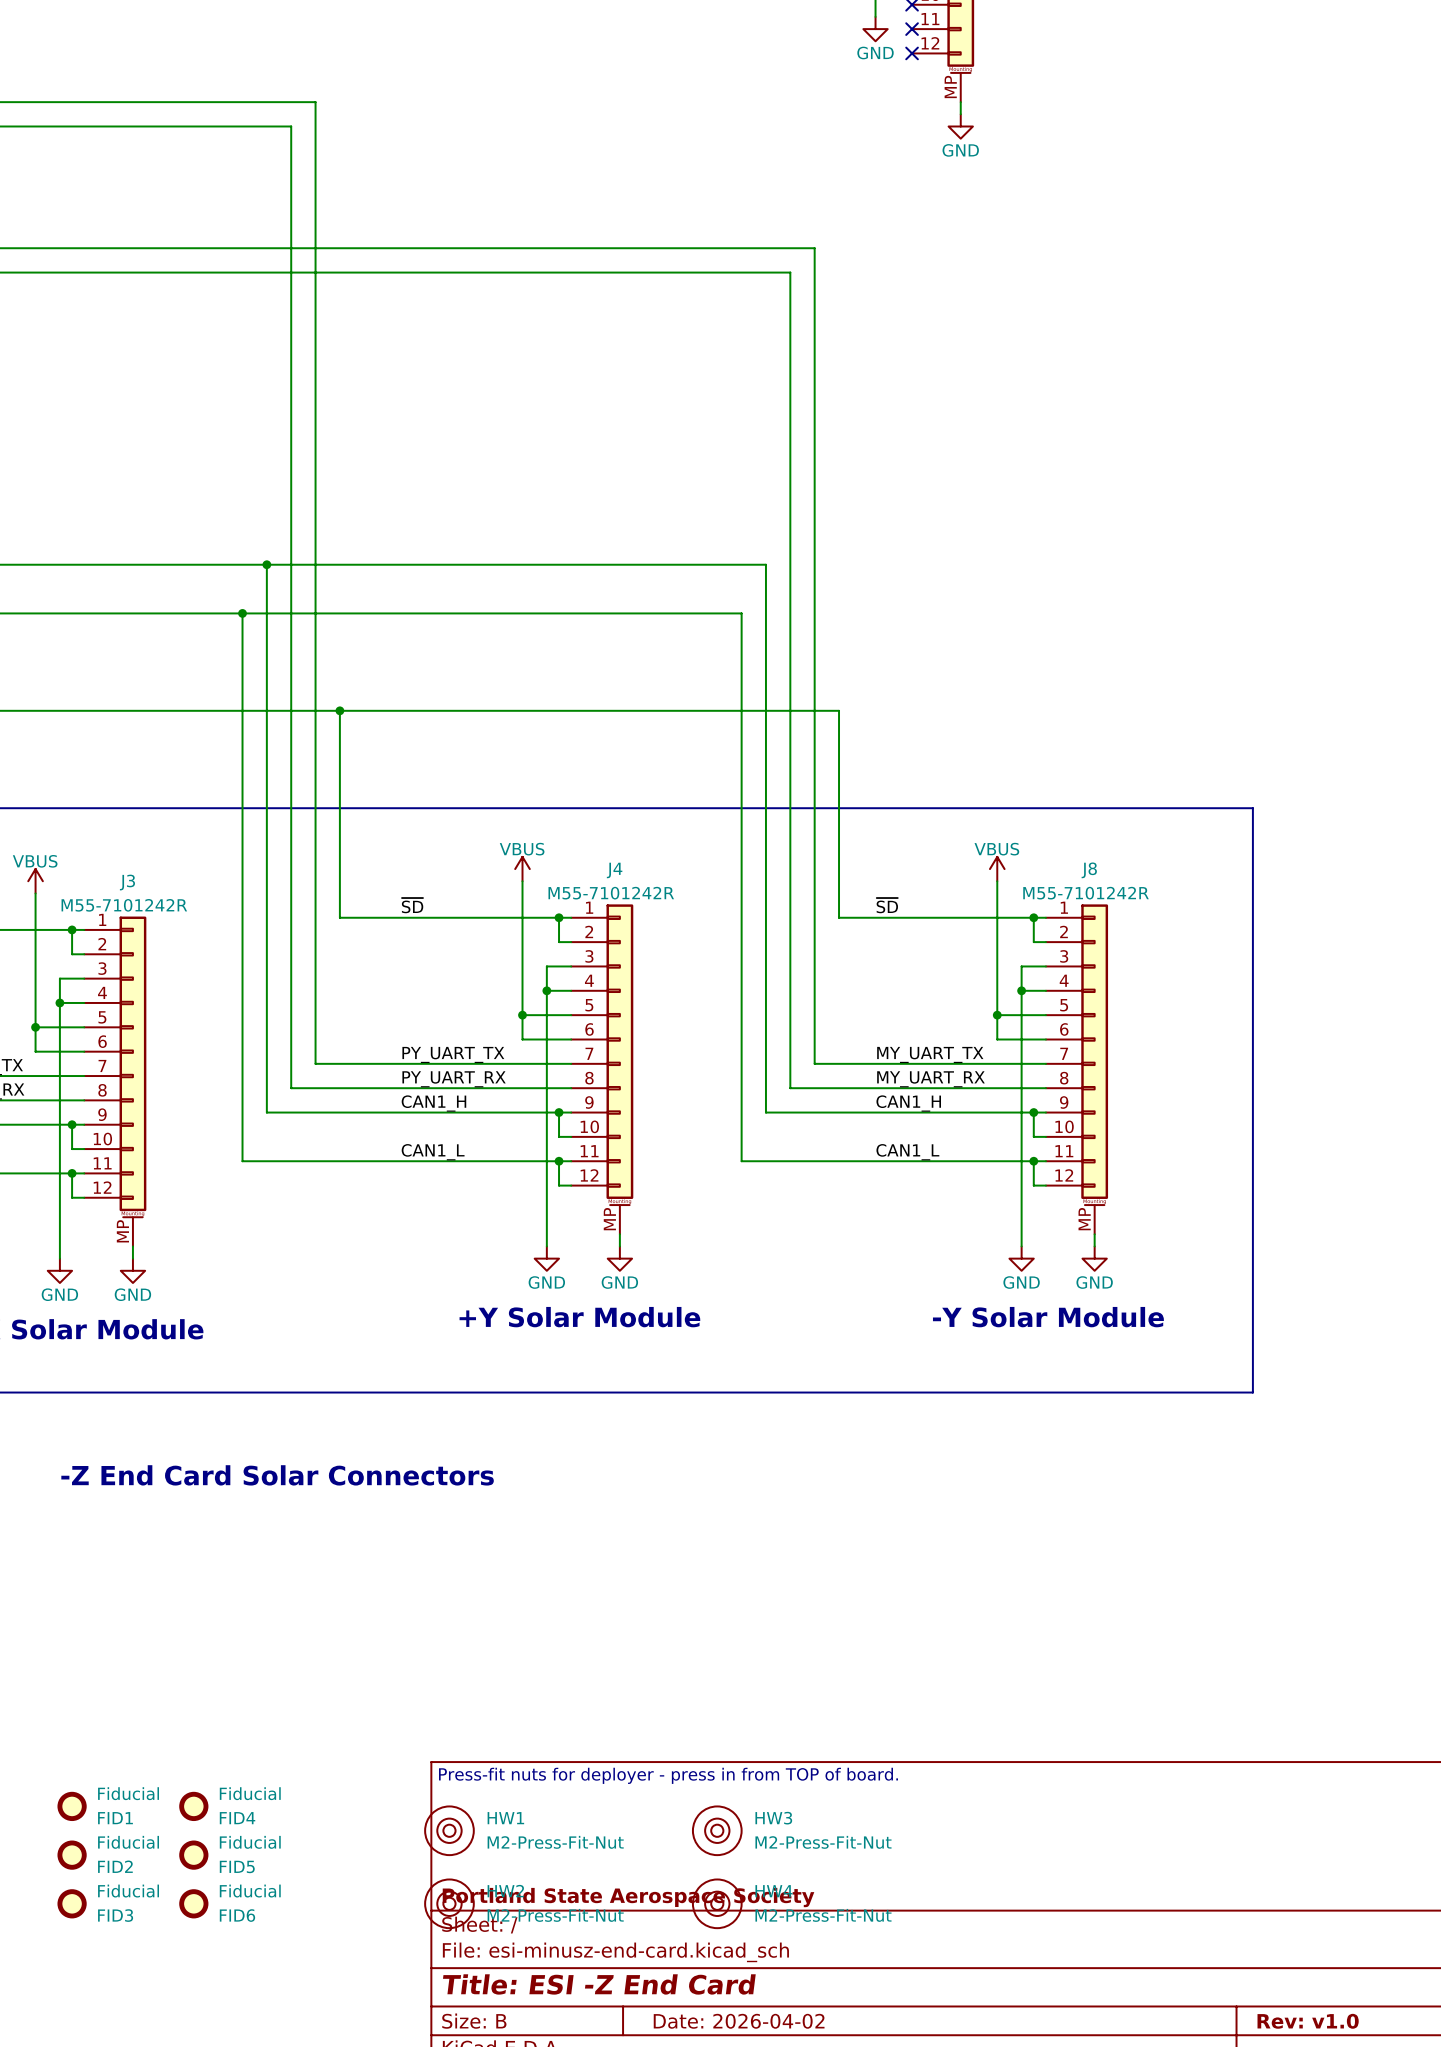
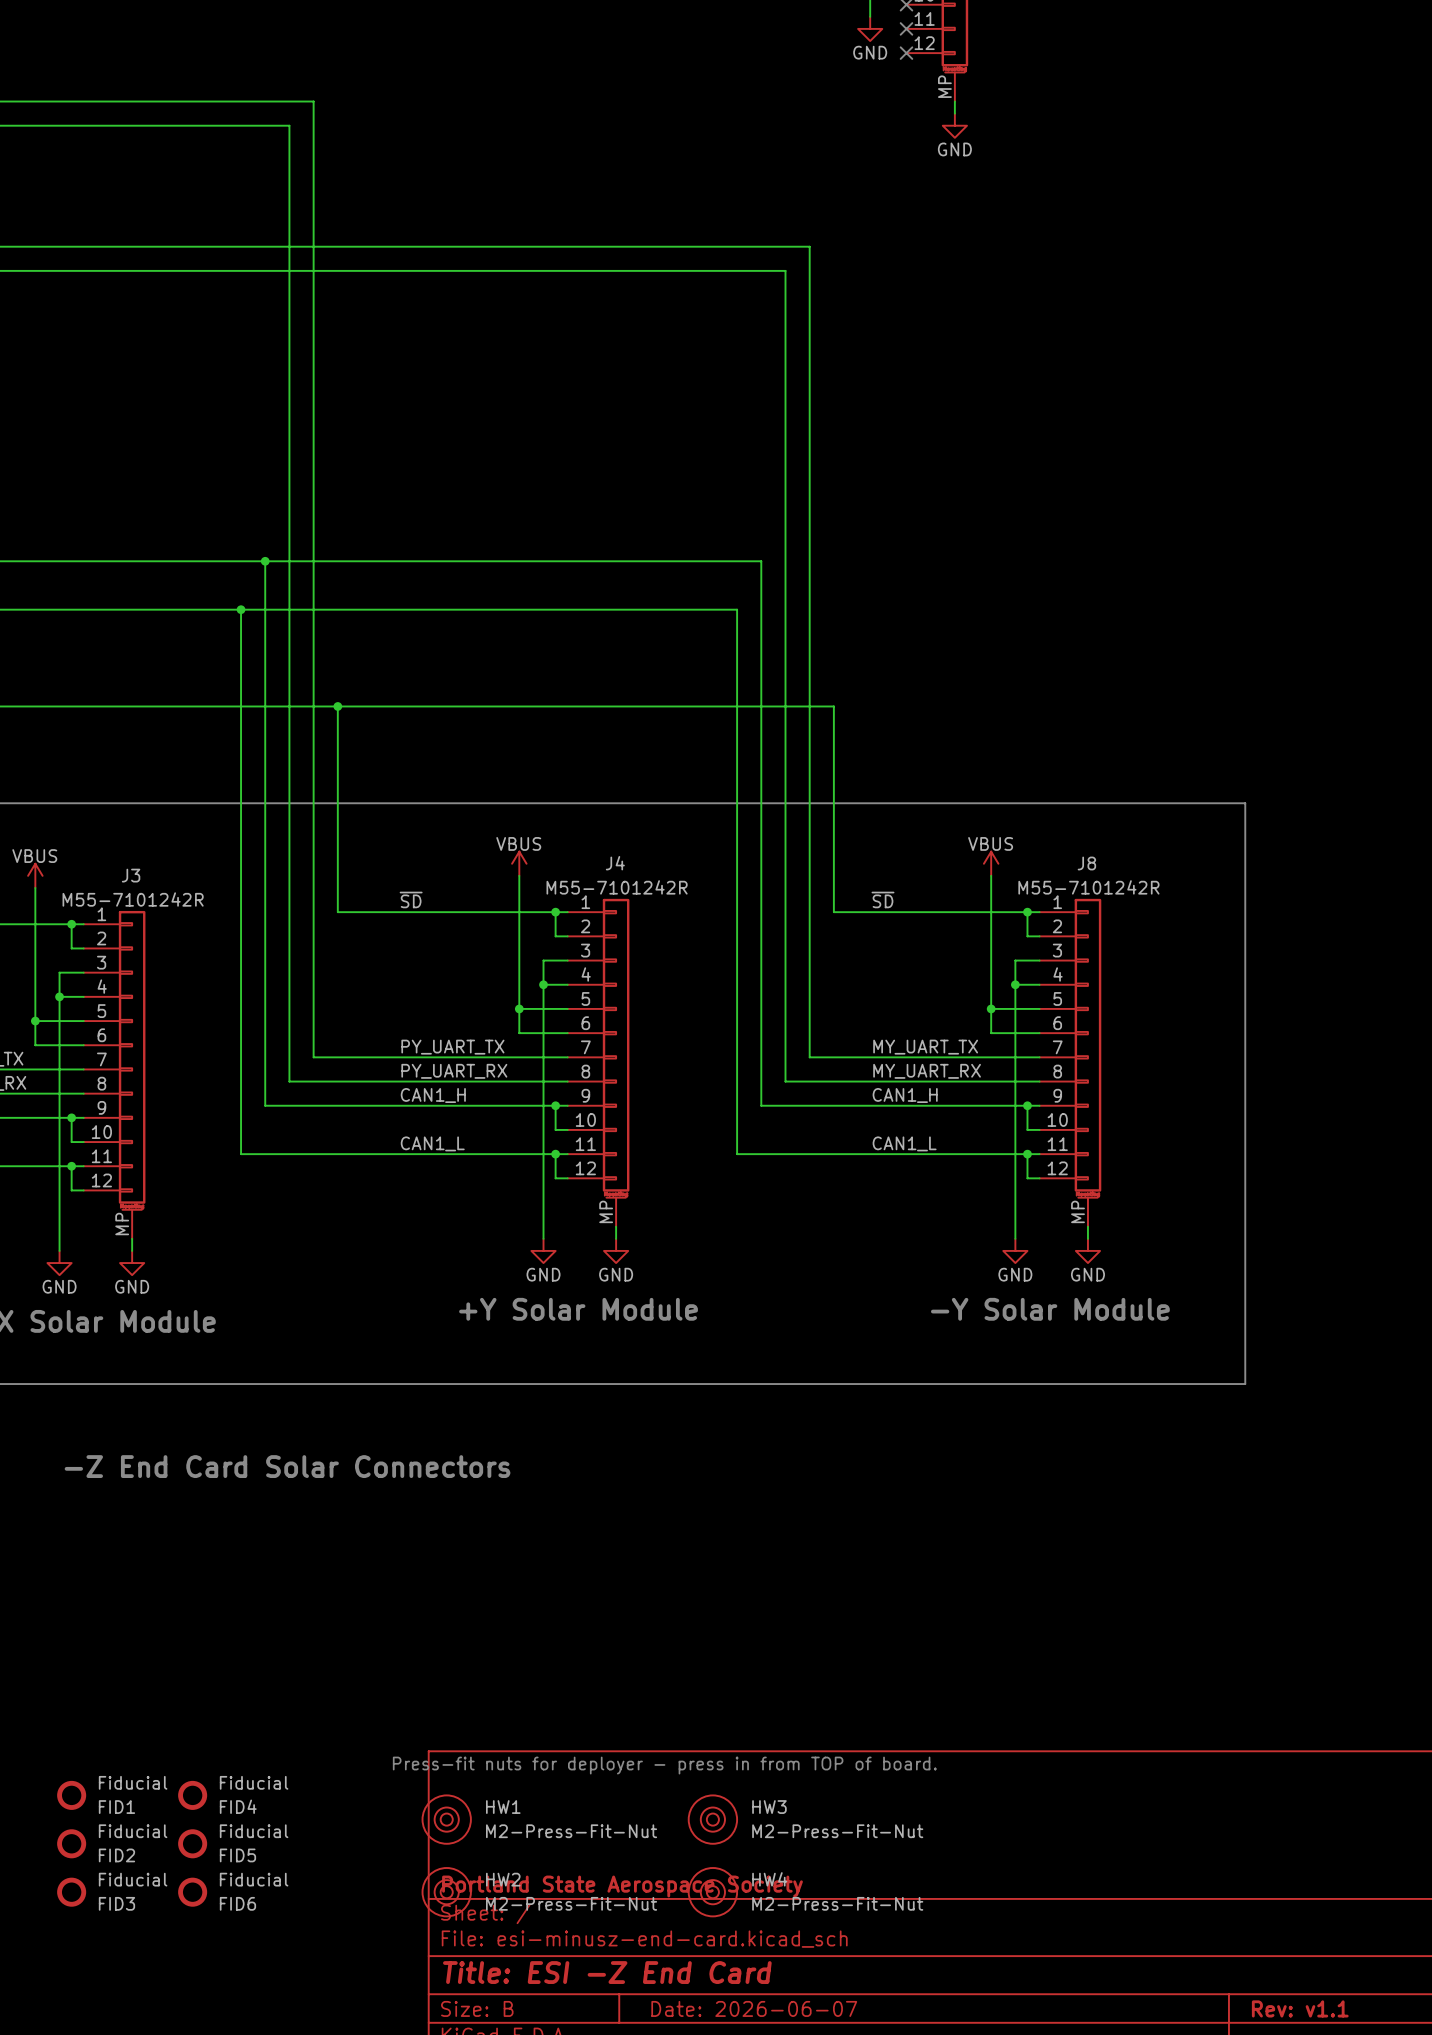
title block: Date: 2026-04-02 (739, 2021) -> Date: 2026-06-07 (754, 2008)
title block: Rev: v1.0 (1308, 2021) -> Rev: v1.1 (1300, 2008)

